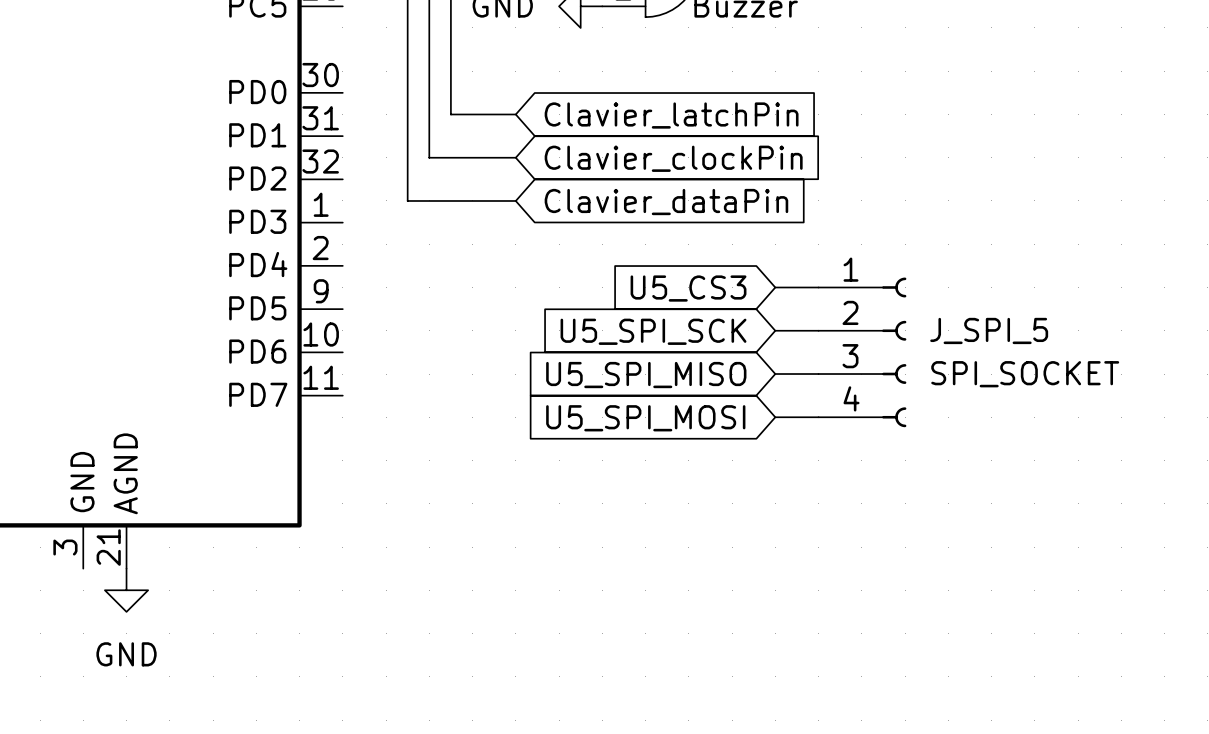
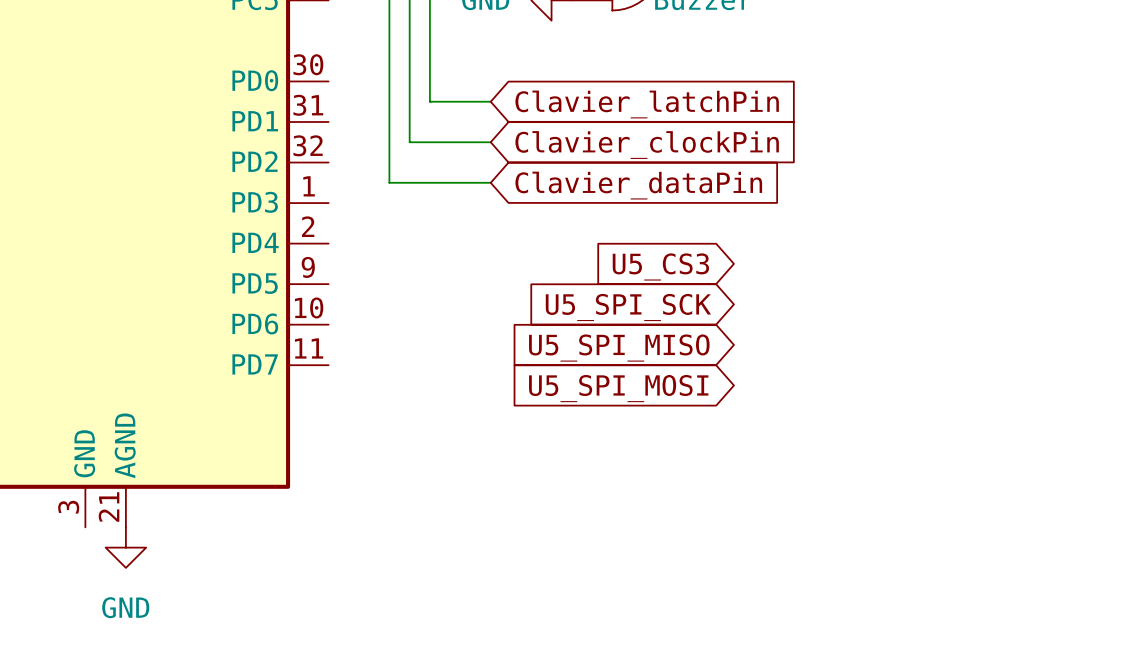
wire: (775, 287) (818, 287) -> none
wire: (775, 330) (818, 330) -> none
J_SPI_5: SPI_SOCKET (862, 352) -> none
wire: (775, 374) (818, 374) -> none
wire: (775, 417) (818, 417) -> none

